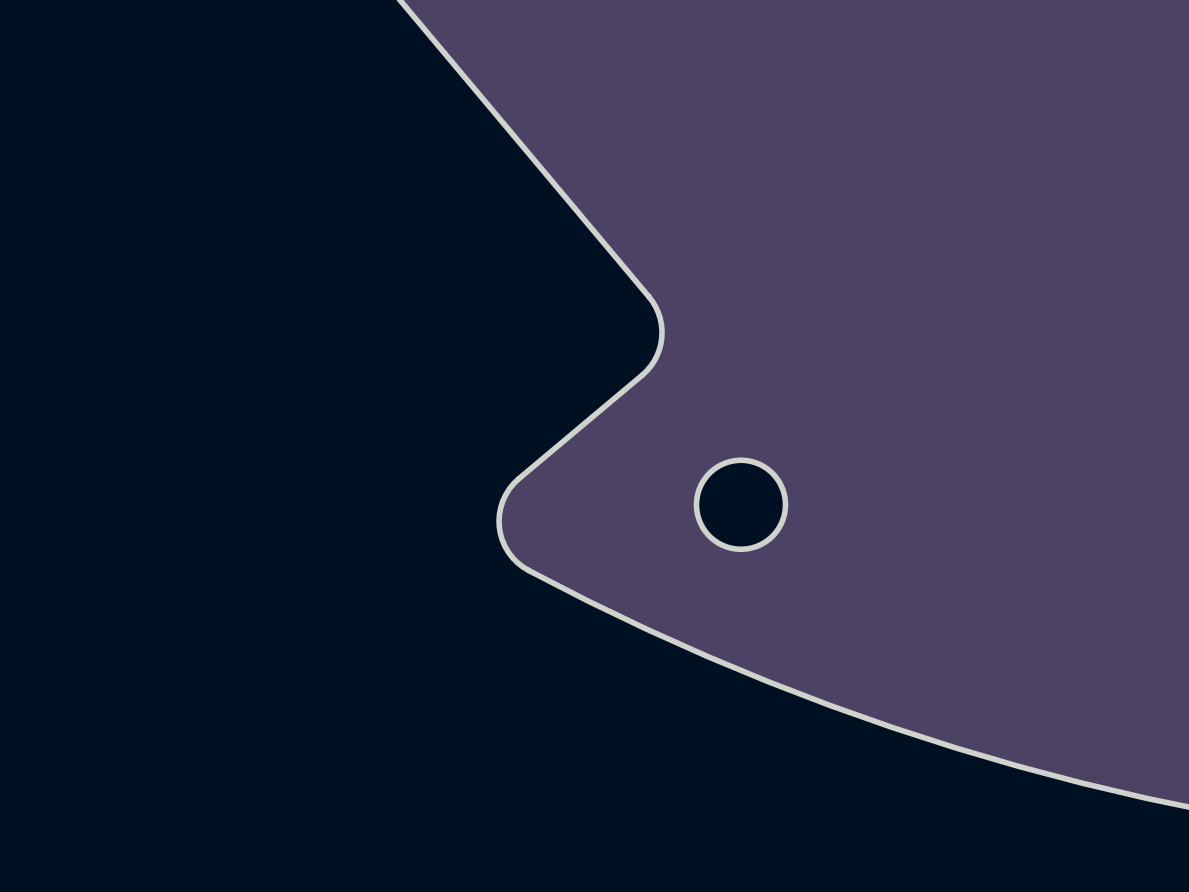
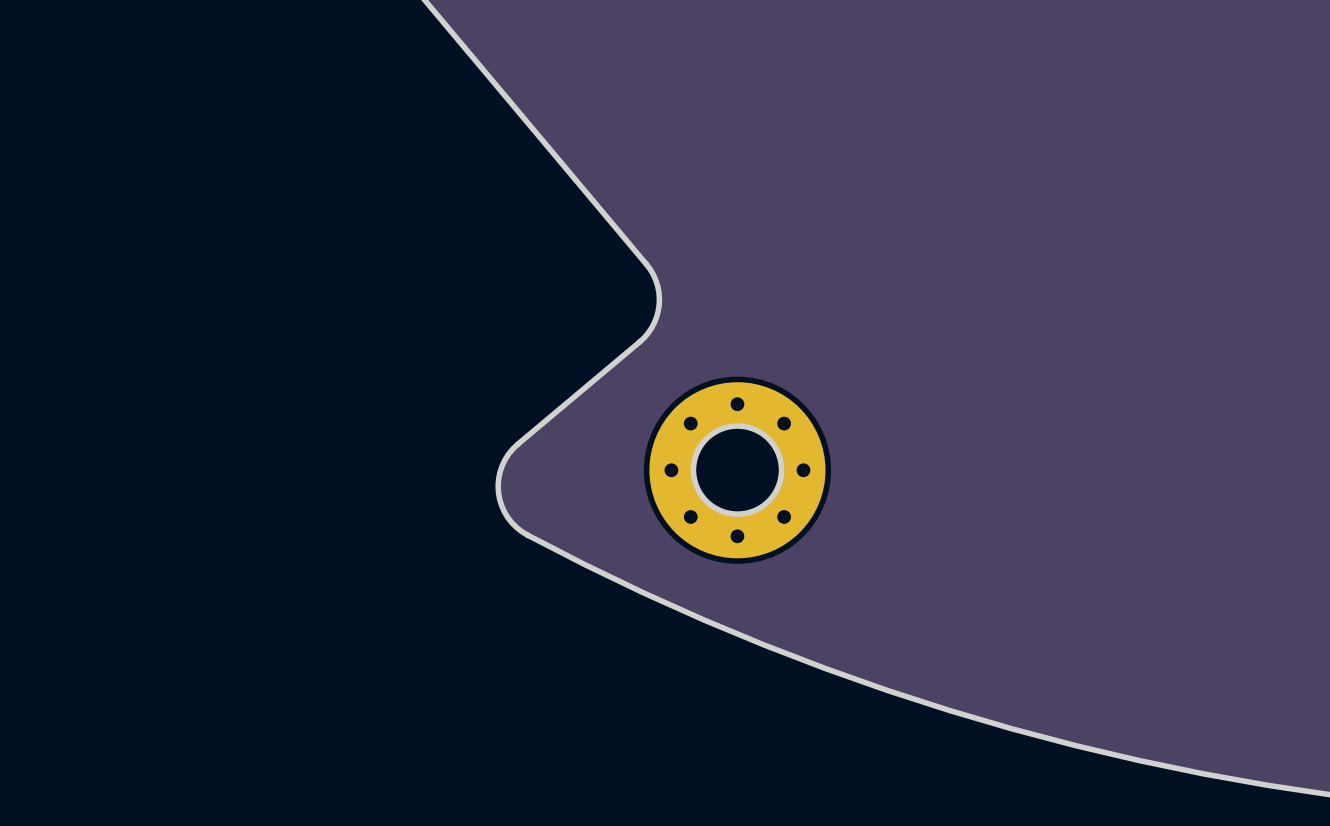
part: none -> (737, 470)

